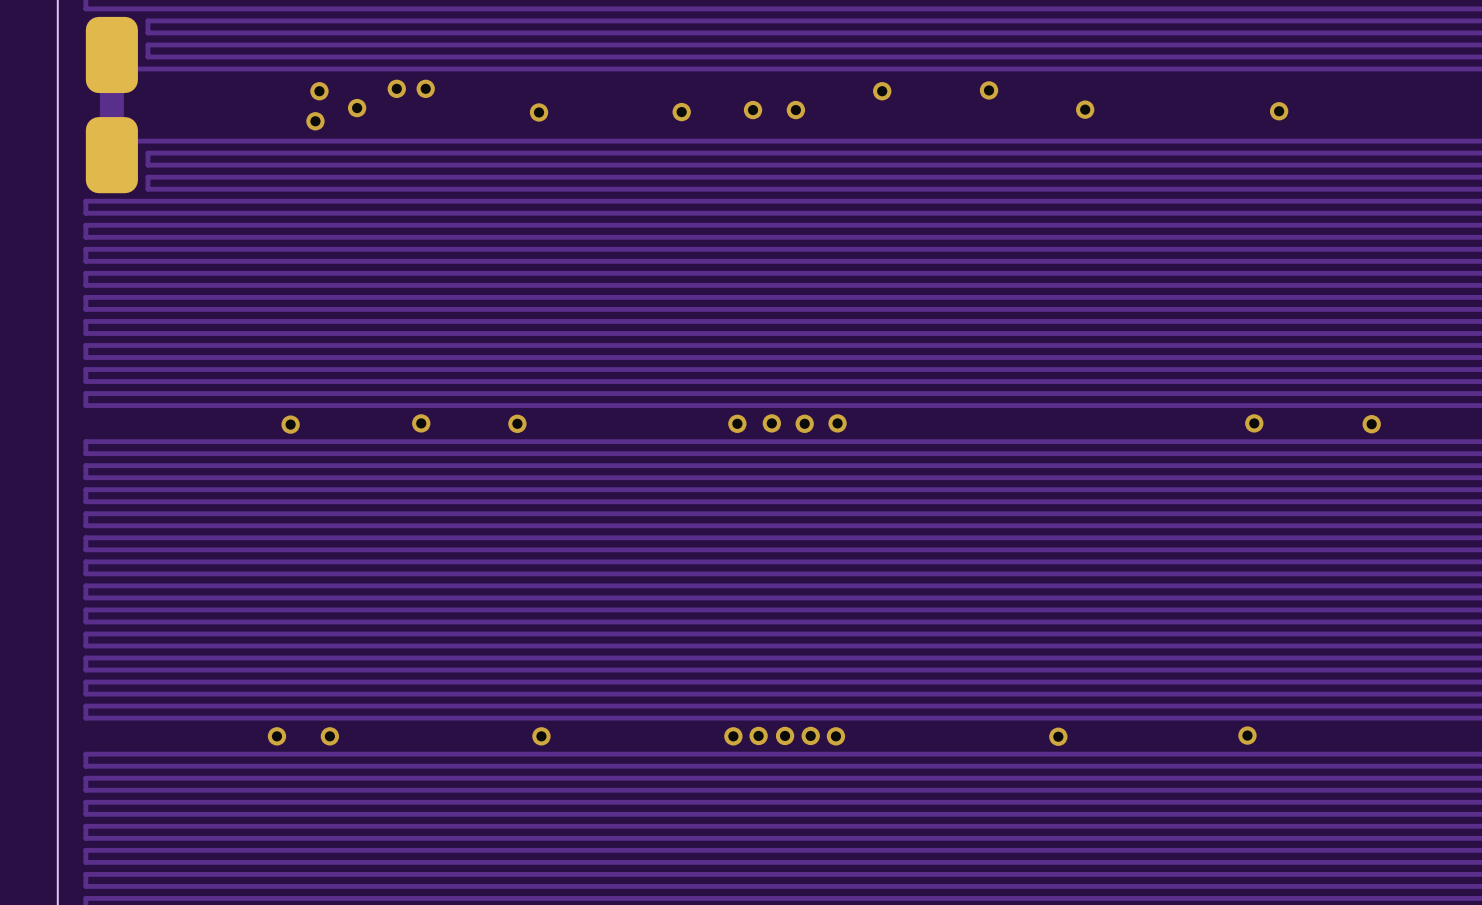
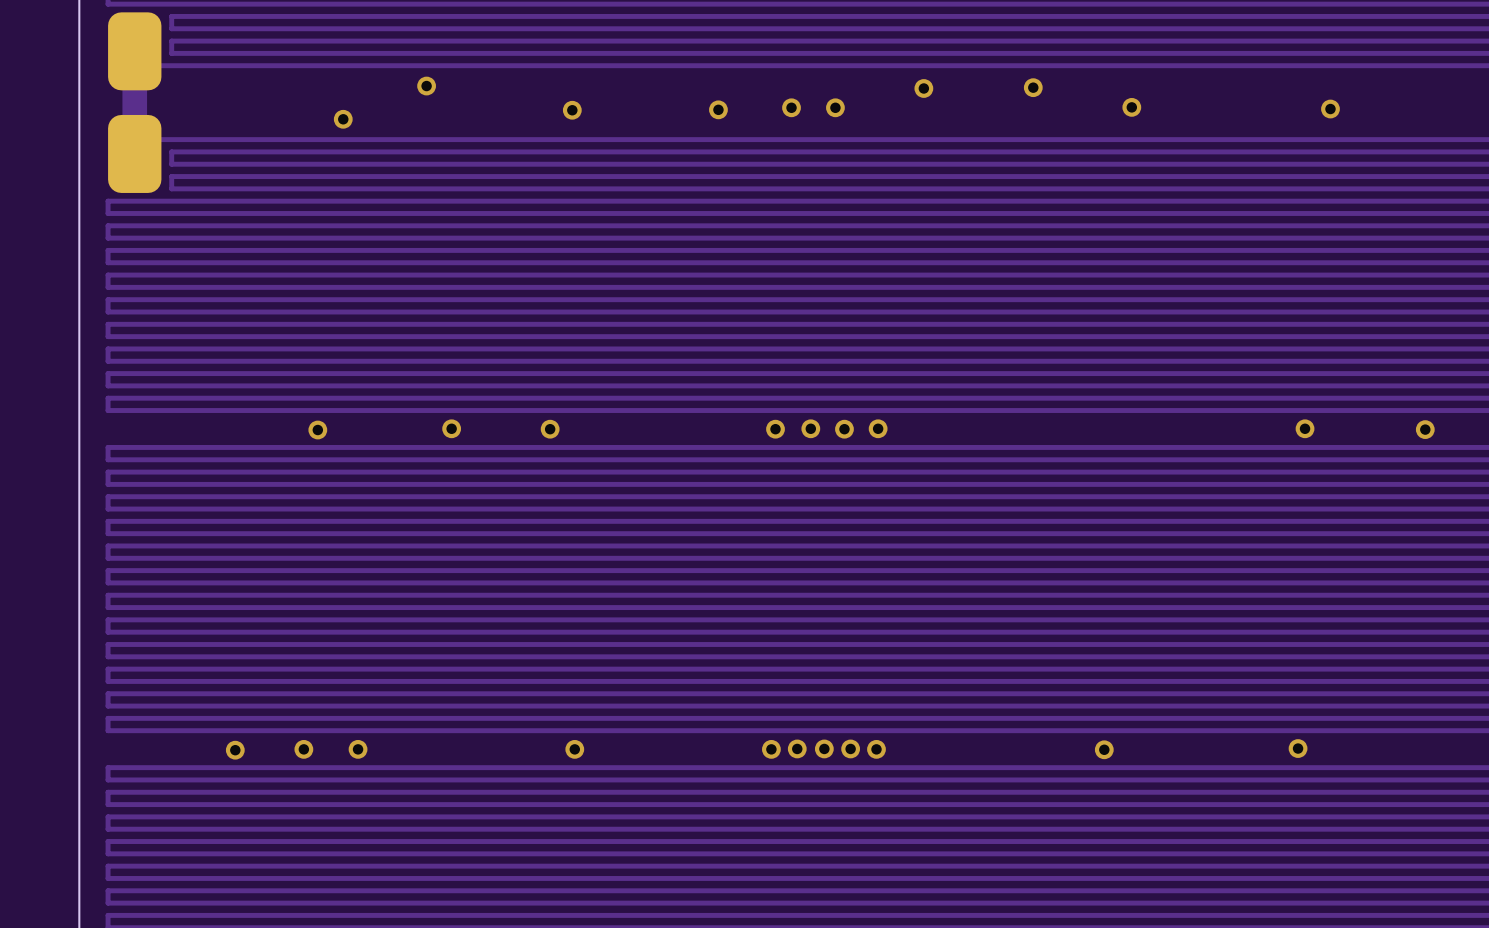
via: (425, 88) -> none
via: (319, 91) -> none
via: (357, 108) -> none
via: none -> (235, 750)

